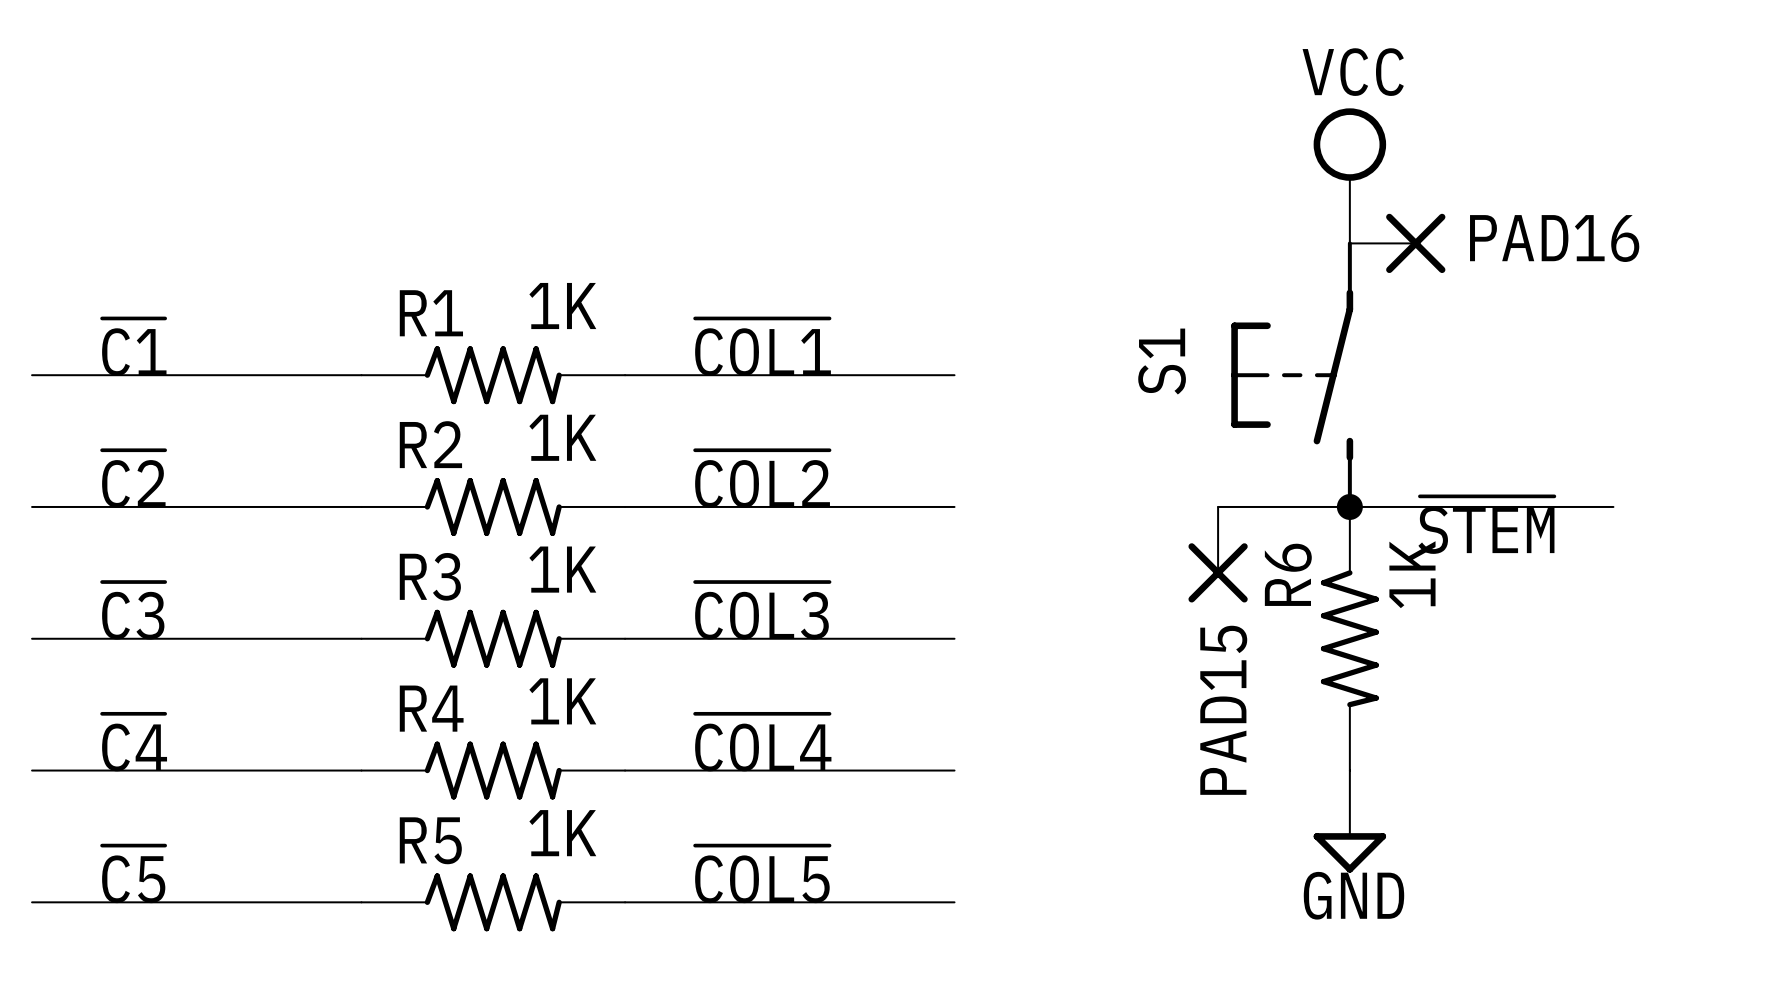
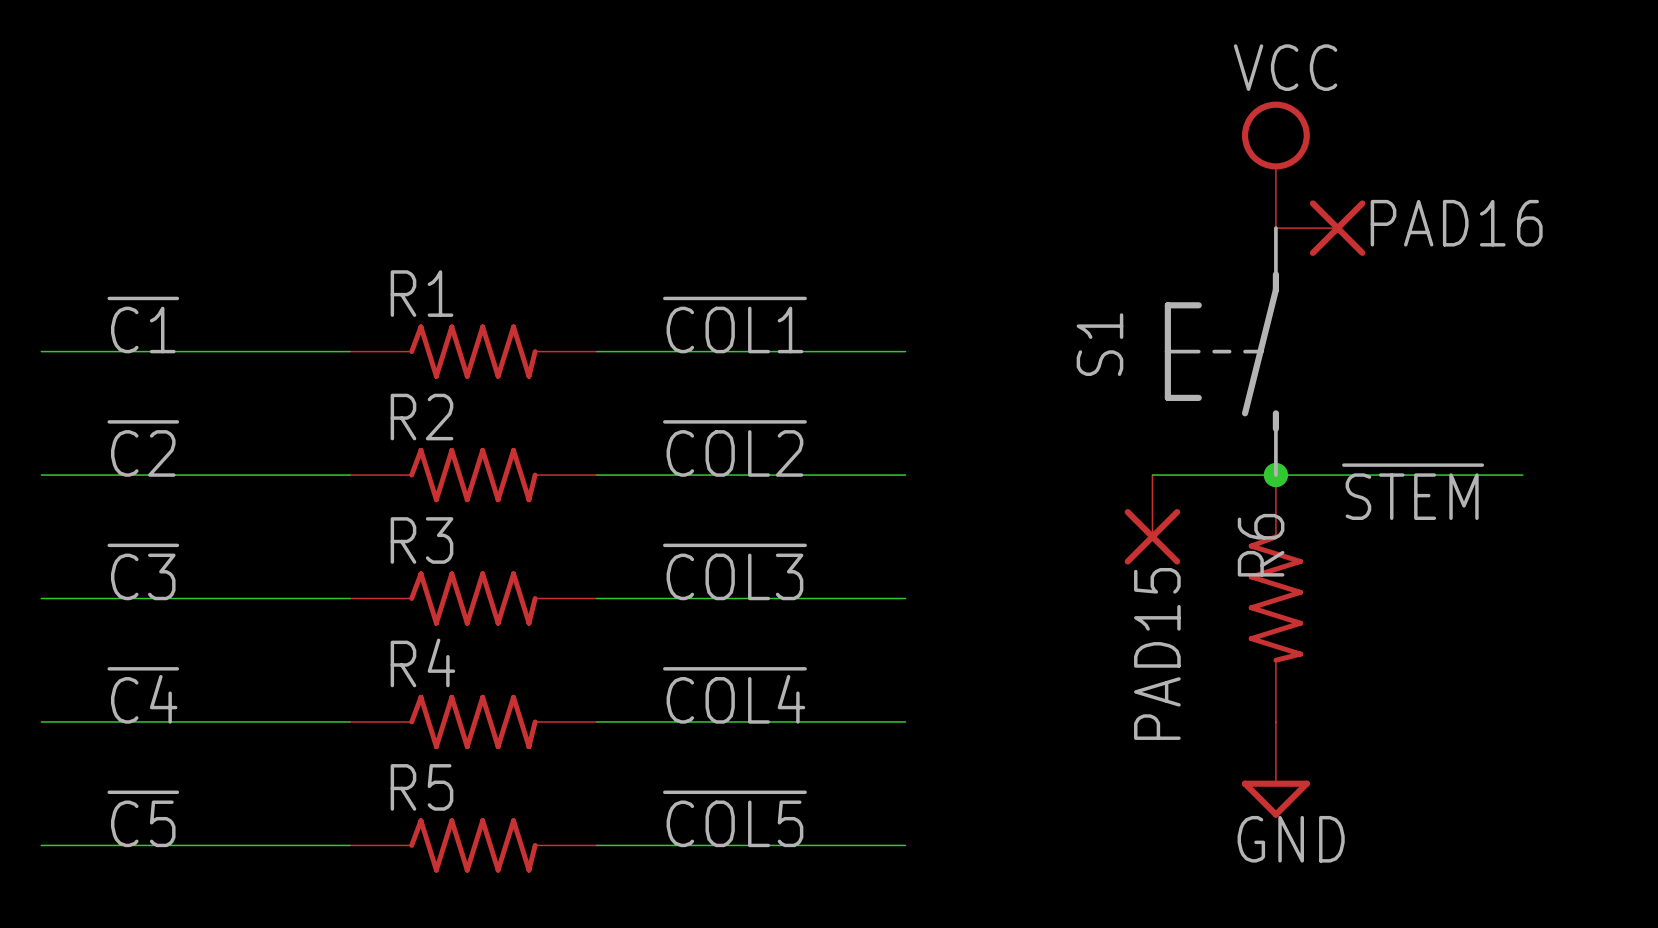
R1 value: 1K (562, 306) -> none
R2 value: 1K (562, 437) -> none
R3 value: 1K (562, 569) -> none
R6 name position: R6 (1288, 574) -> R6 (1261, 545)
R6 value: 1K (1412, 574) -> none
R4 value: 1K (562, 701) -> none
R5 value: 1K (562, 833) -> none

